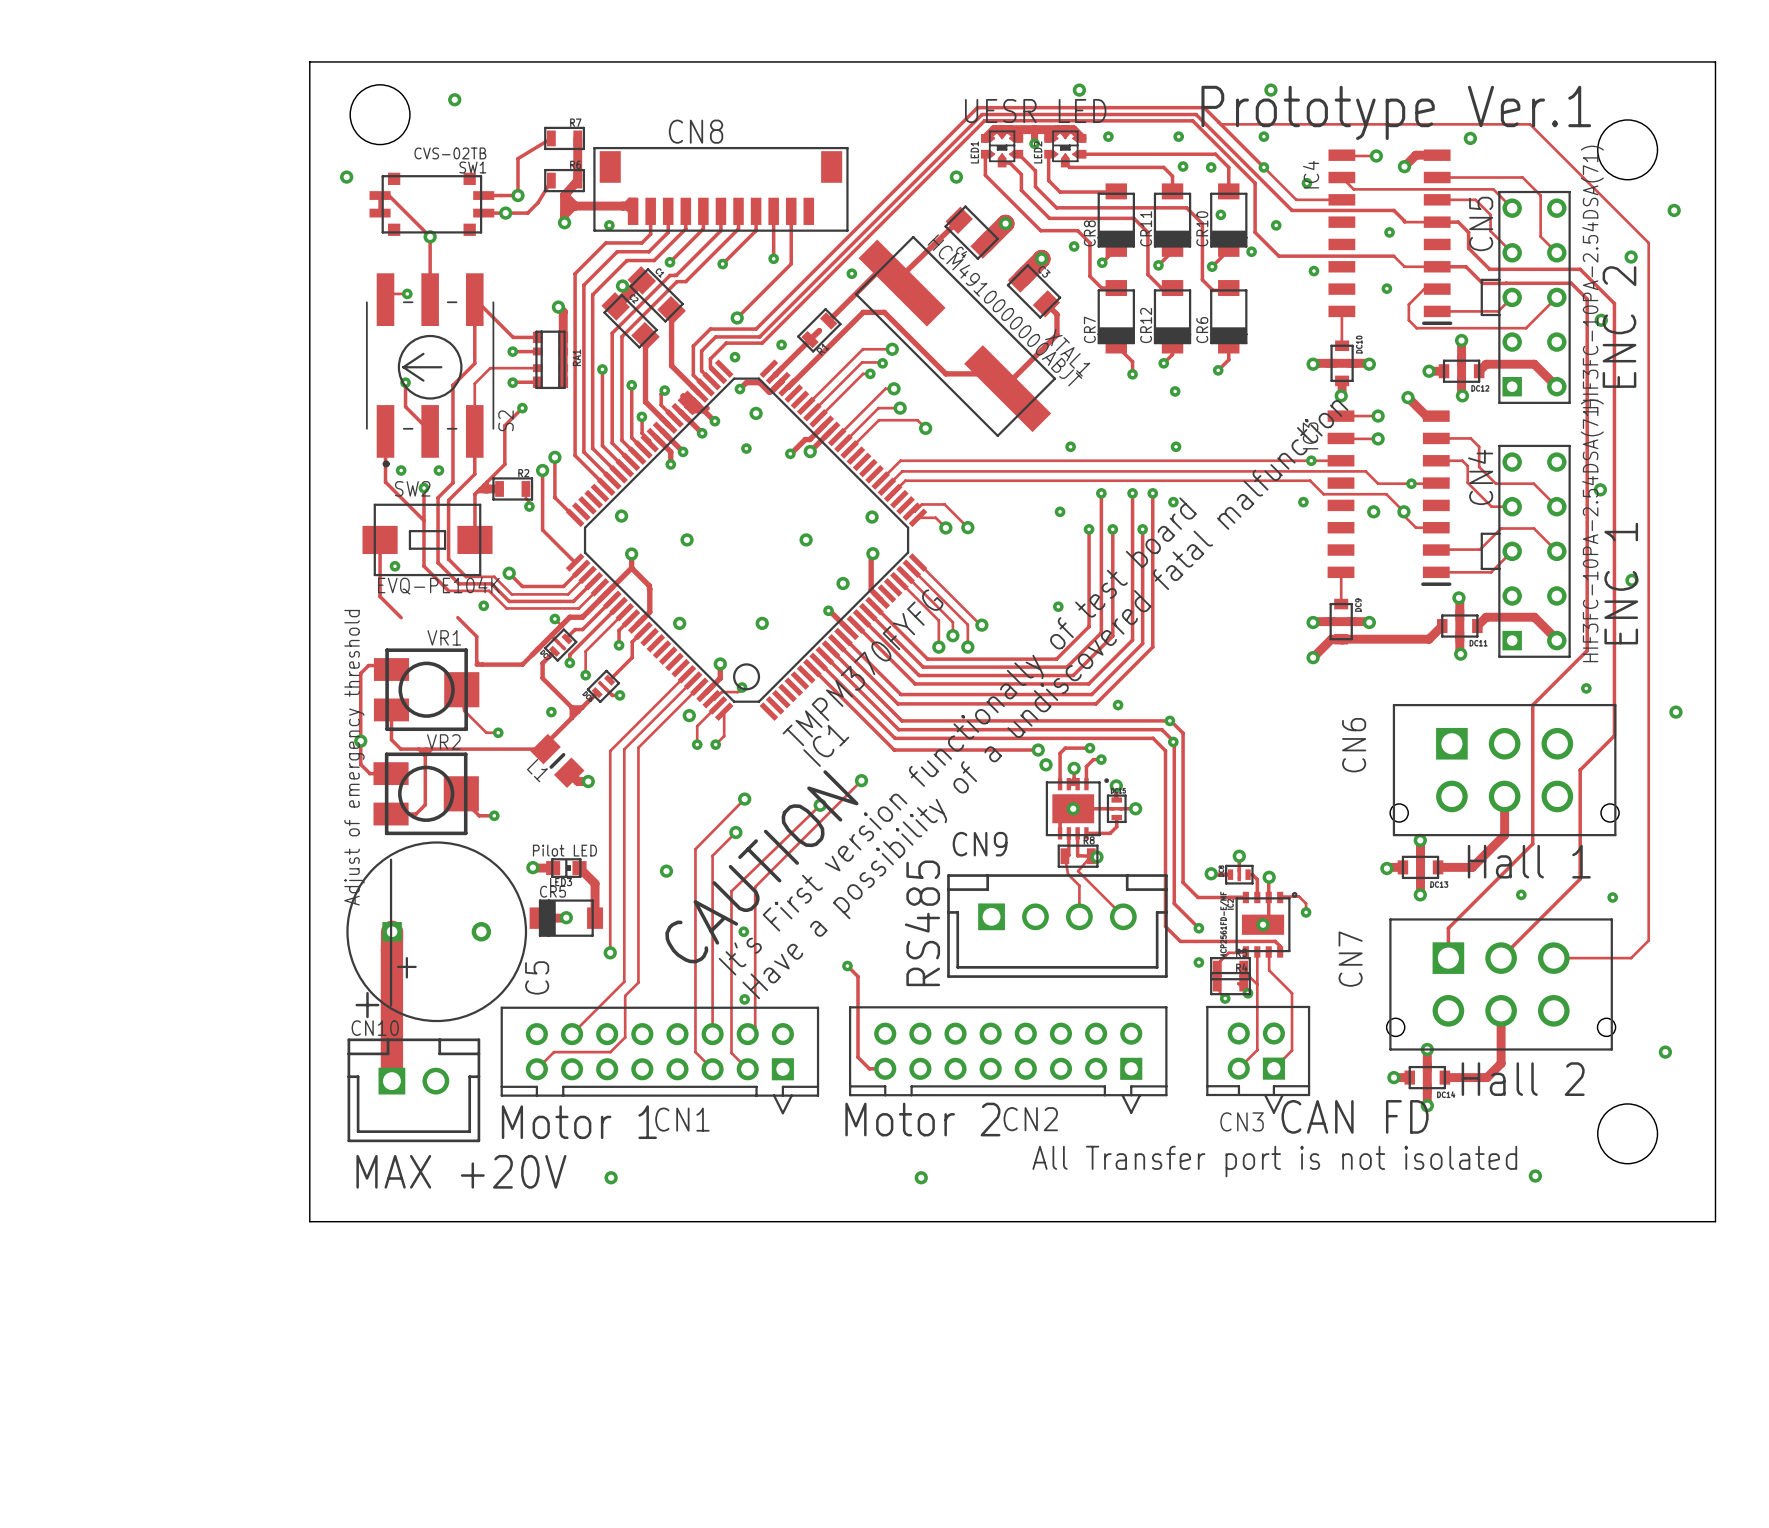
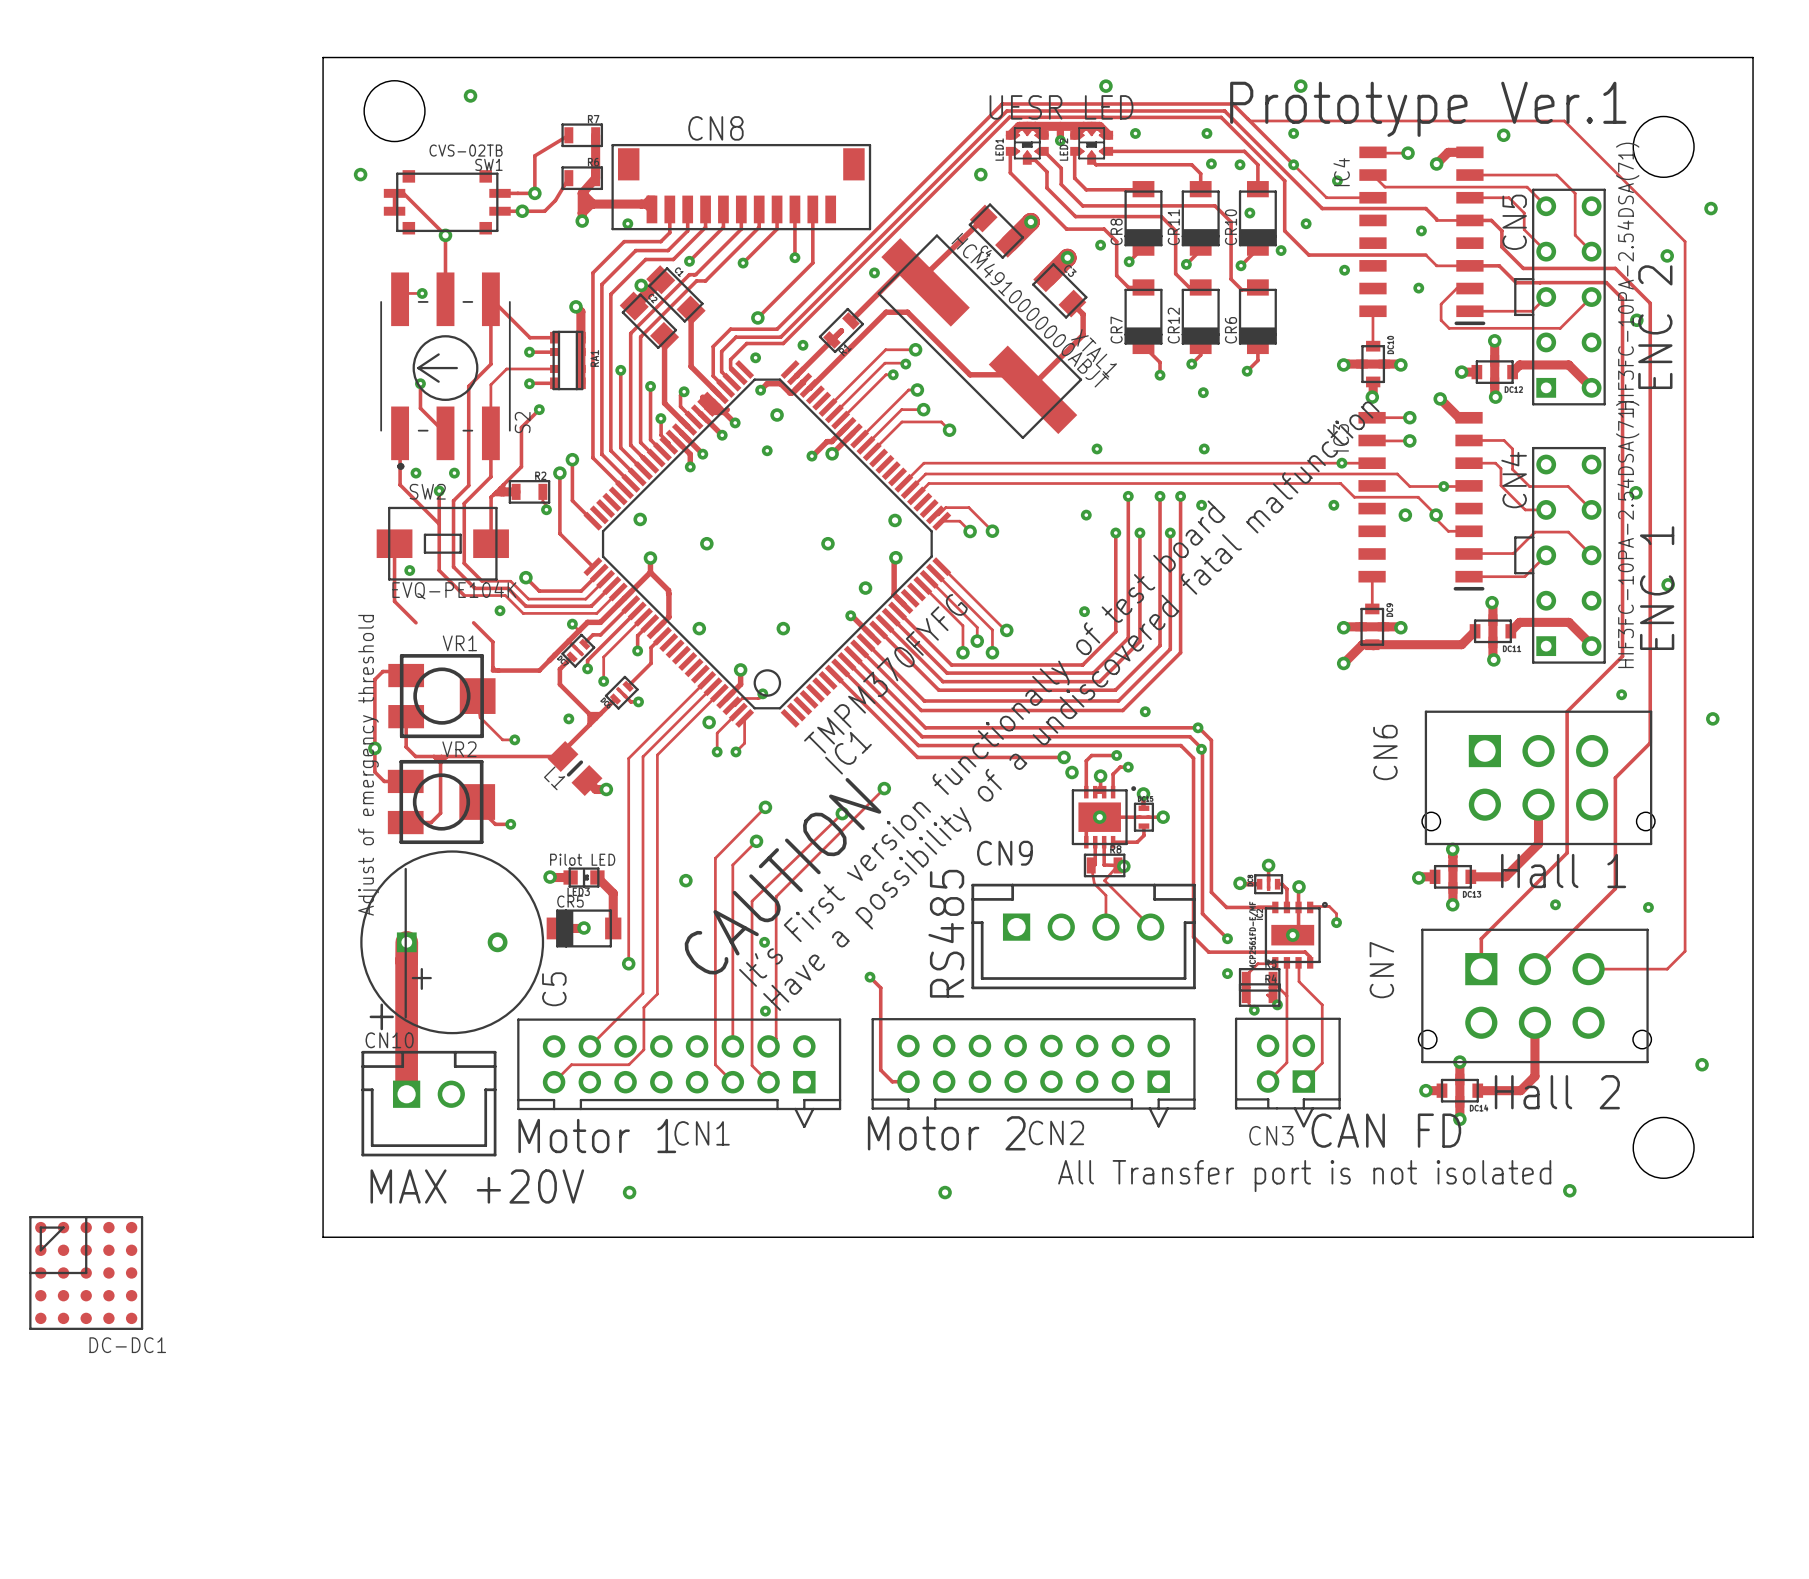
DC-DC1: none -> (86, 1272)

